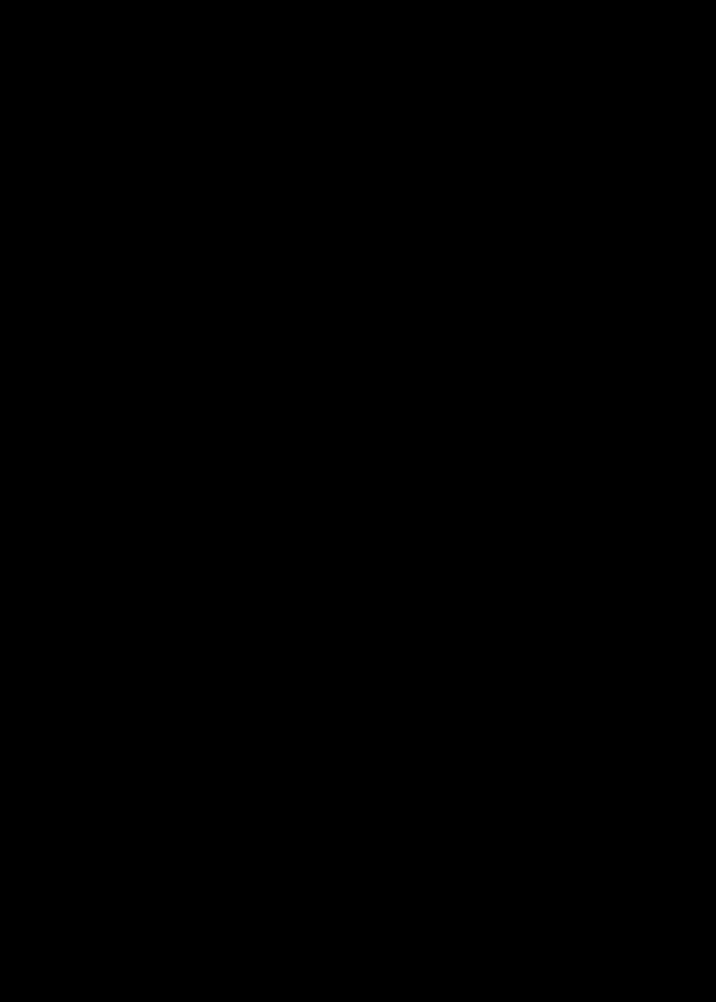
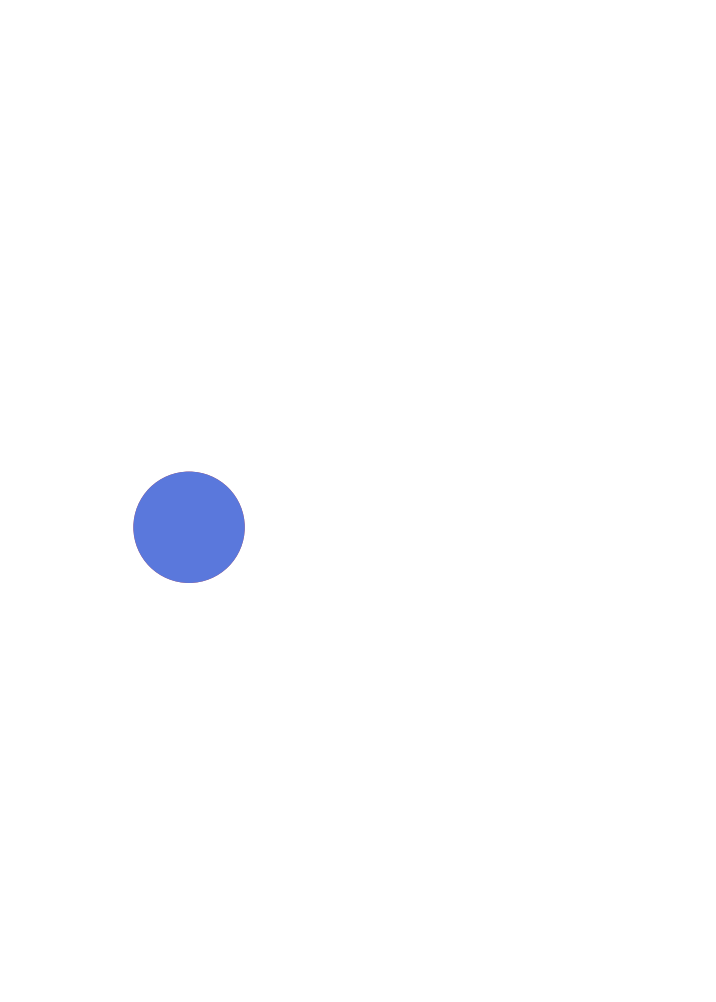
part: none -> (189, 527)

